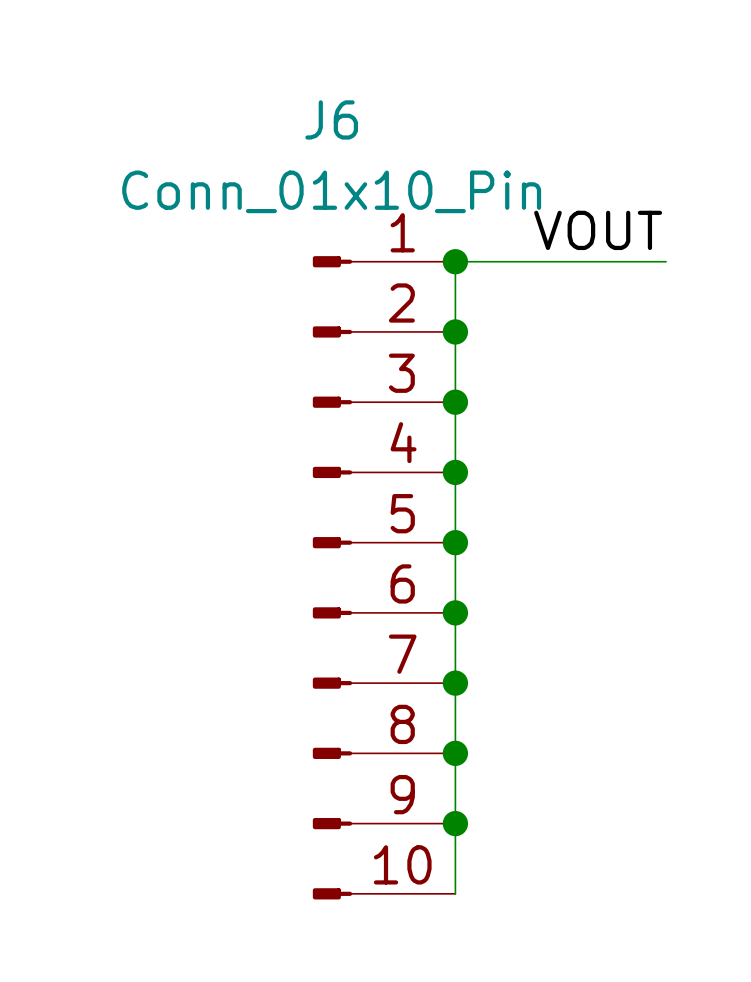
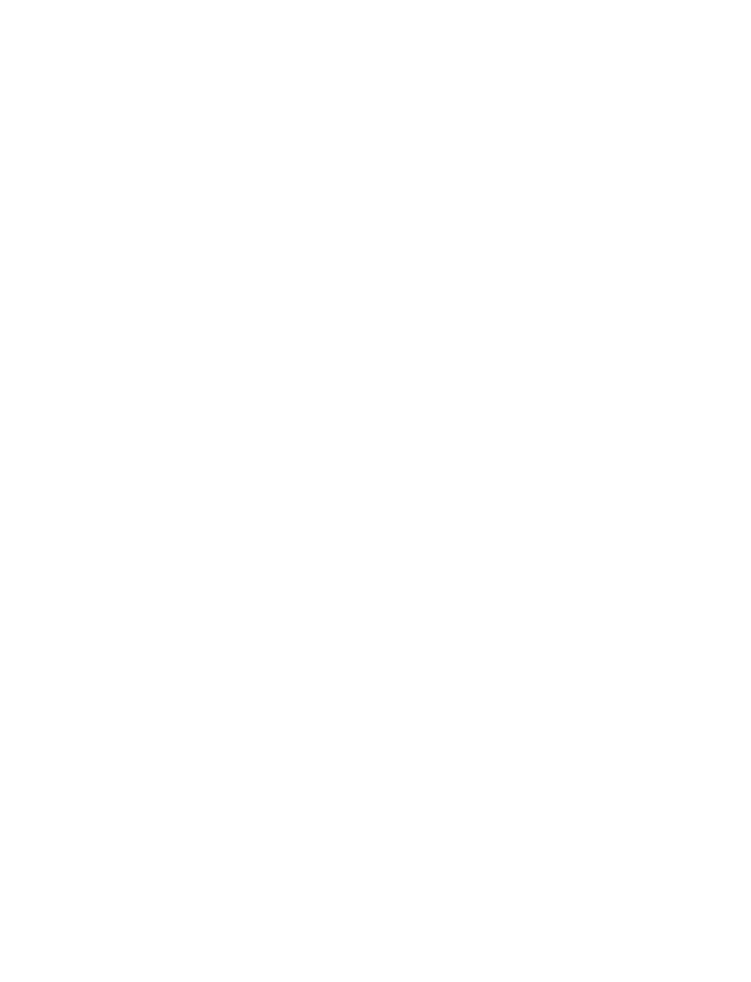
label: VOUT (598, 230) -> none
junction: (455, 261) -> none
wire: (666, 261) (455, 261) (455, 893) -> none
junction: (455, 331) -> none
junction: (455, 402) -> none
junction: (455, 472) -> none
junction: (455, 542) -> none
J6: Conn_01x10_Pin (384, 577) -> none
junction: (455, 612) -> none
junction: (455, 683) -> none
junction: (455, 753) -> none
junction: (455, 823) -> none

